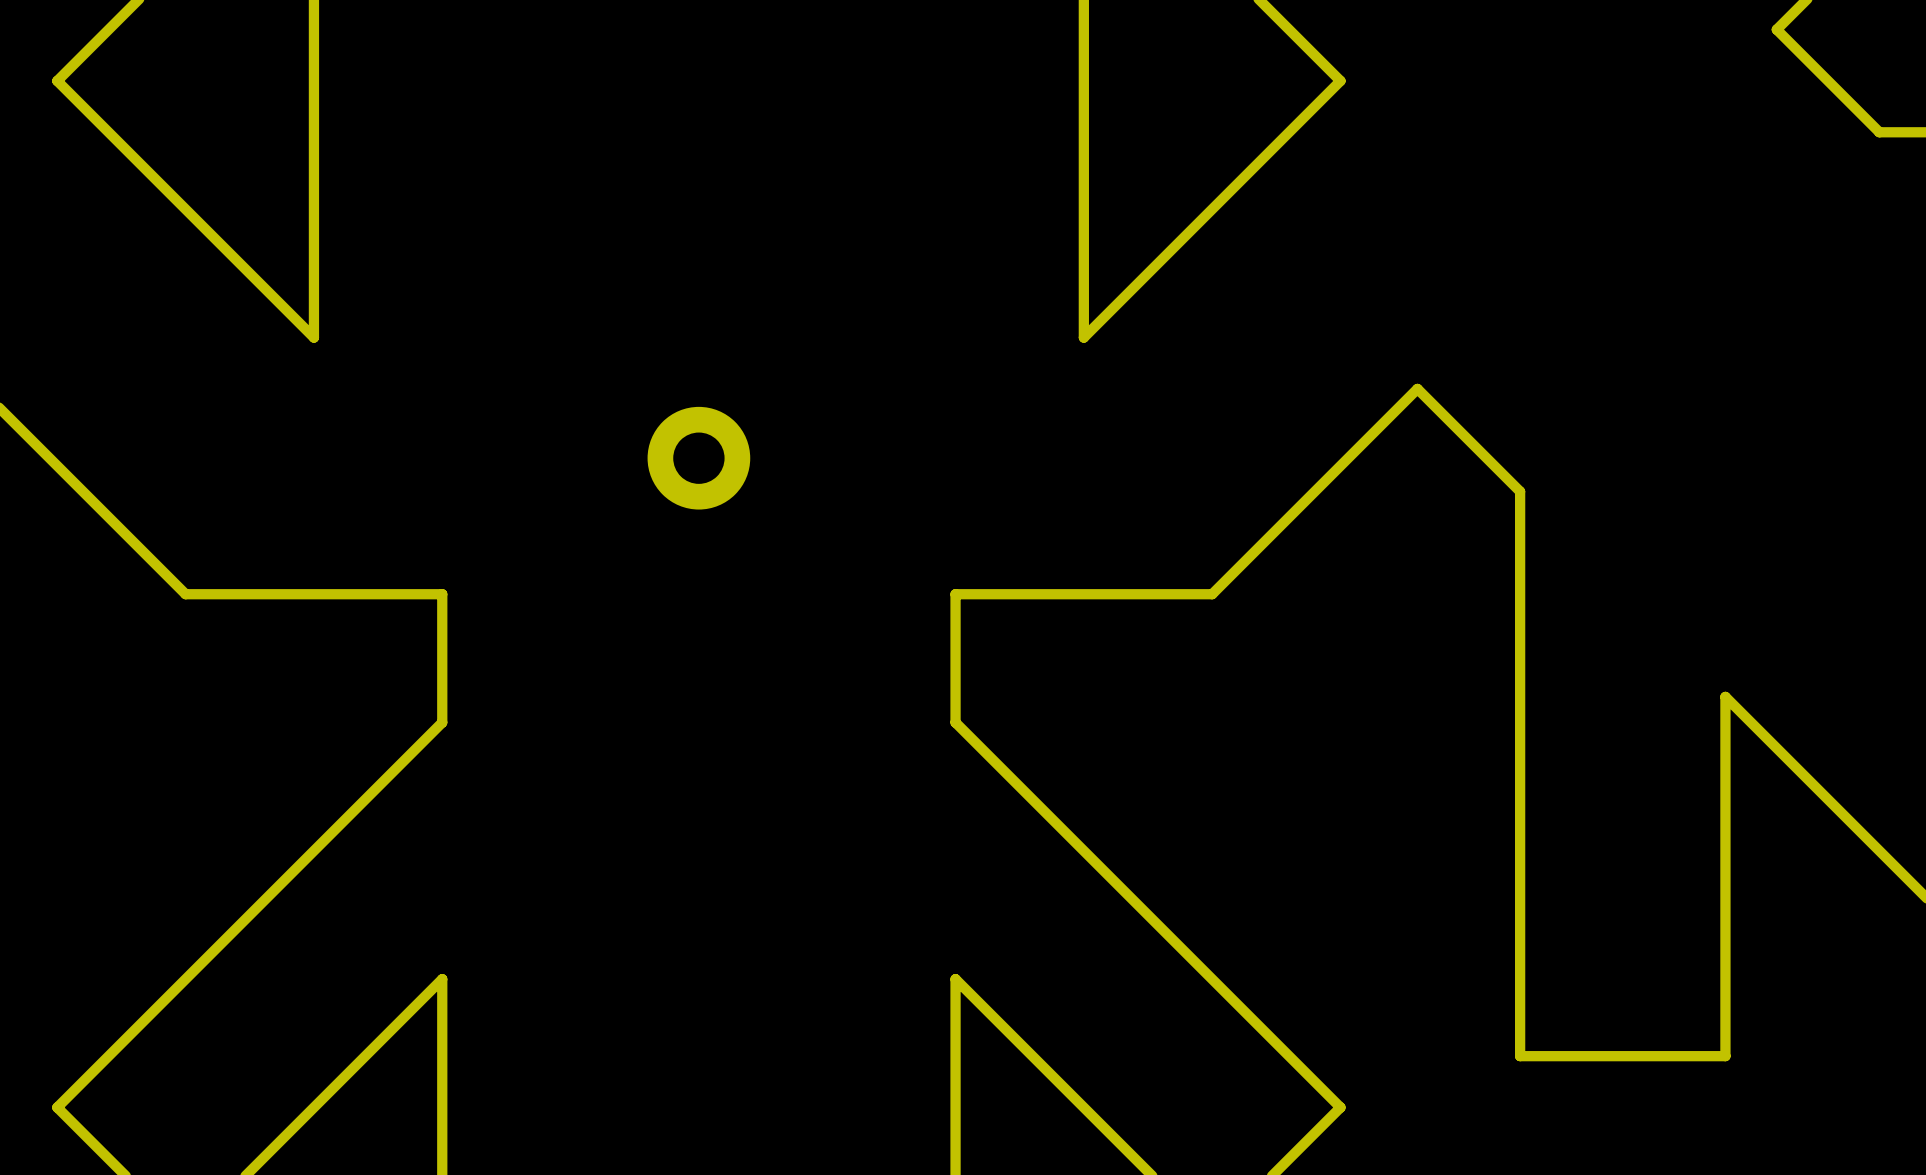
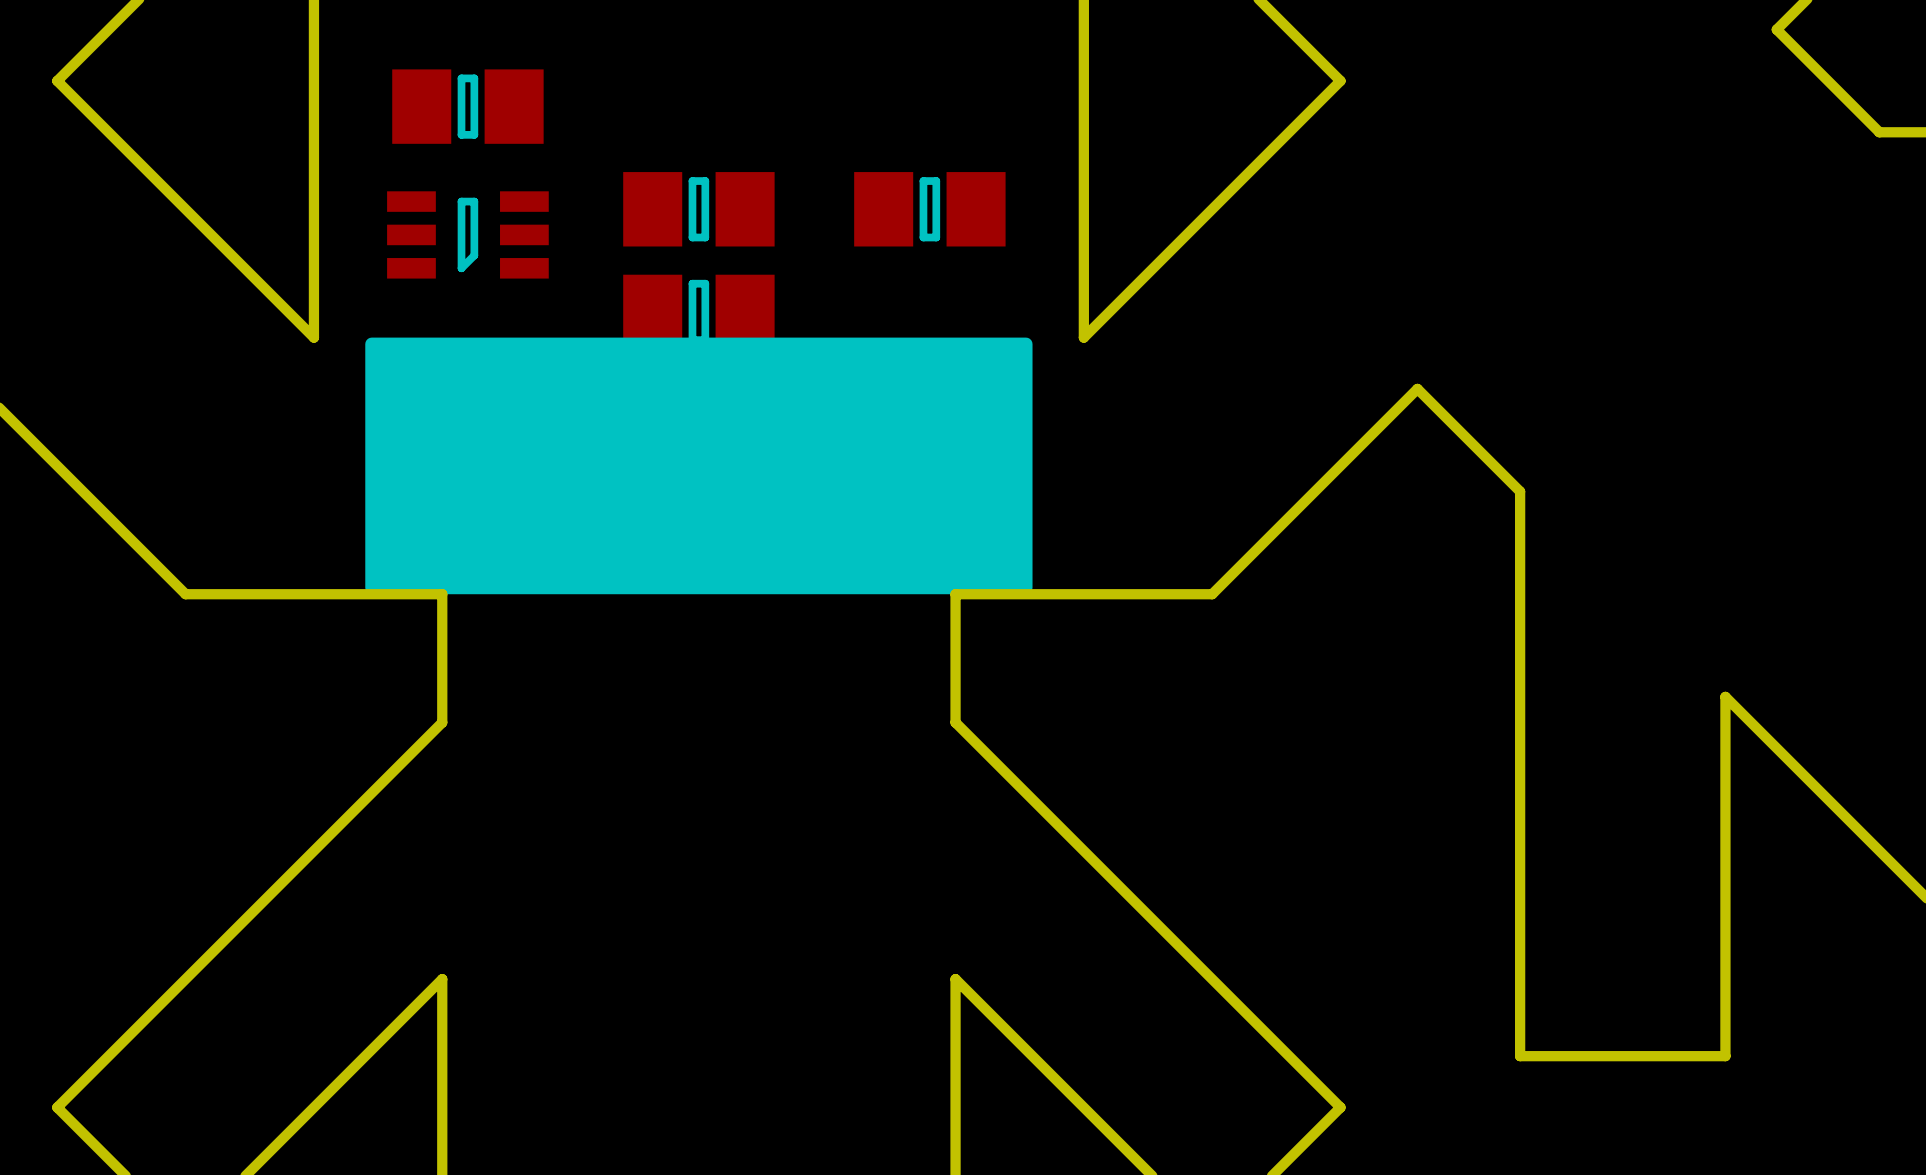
part: none -> (467, 106)
part: none -> (698, 209)
part: none -> (929, 209)
part: none -> (467, 234)
part: none -> (698, 311)
drawing: none -> [365, 337, 1033, 595]

